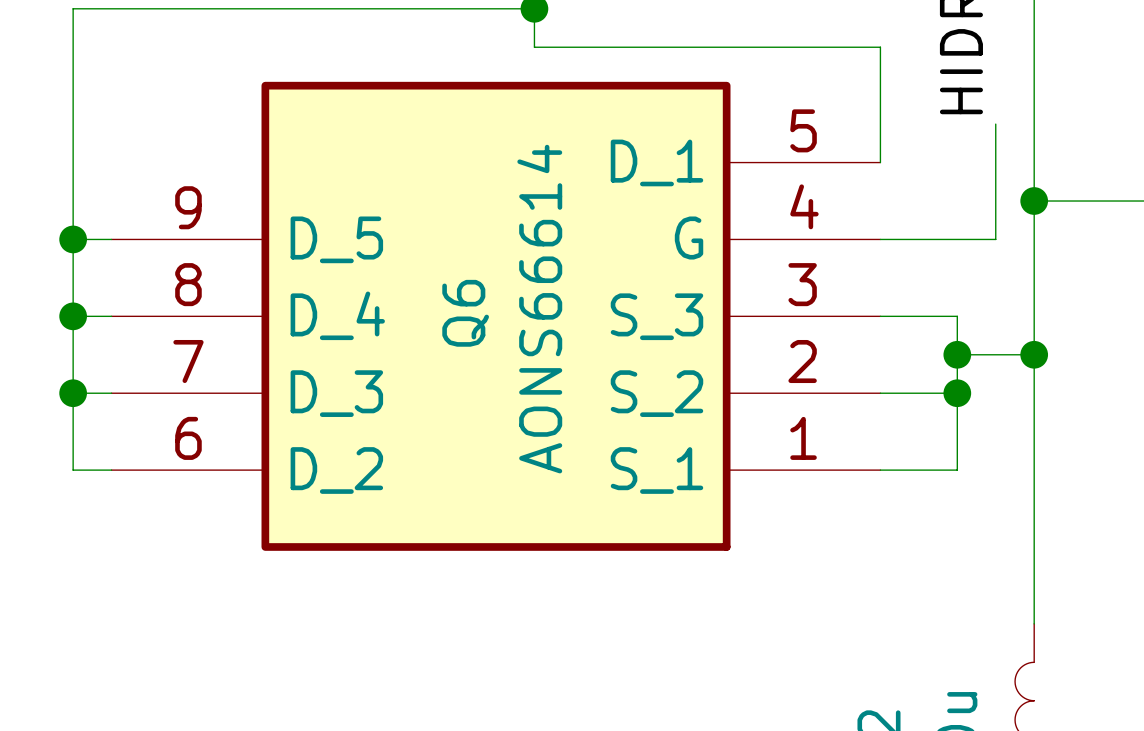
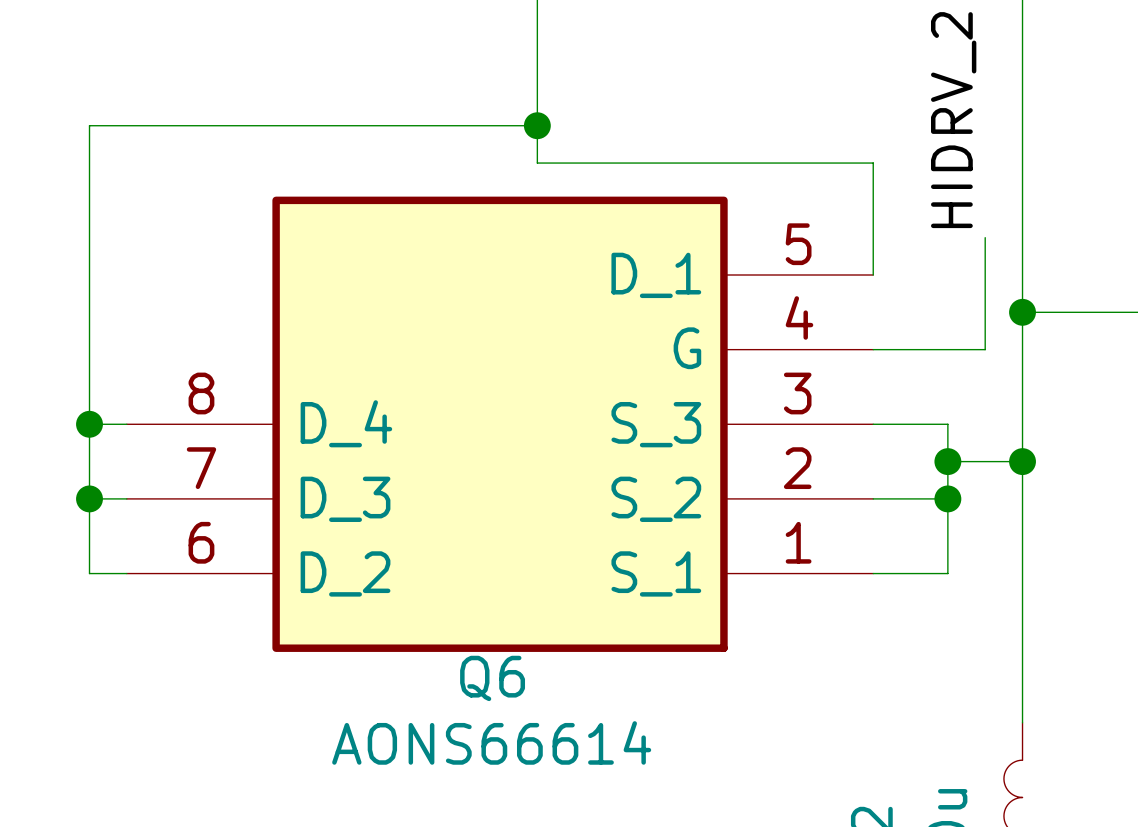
Q6 symbol: [111, 81, 881, 551] -> [126, 196, 874, 652]
wire: (73, 239) (111, 239) -> none
junction: (73, 239) -> none
Q6 value position: AONS66614 (539, 309) -> AONS66614 (491, 742)
Q6 name position: Q6 (465, 313) -> Q6 (492, 678)

